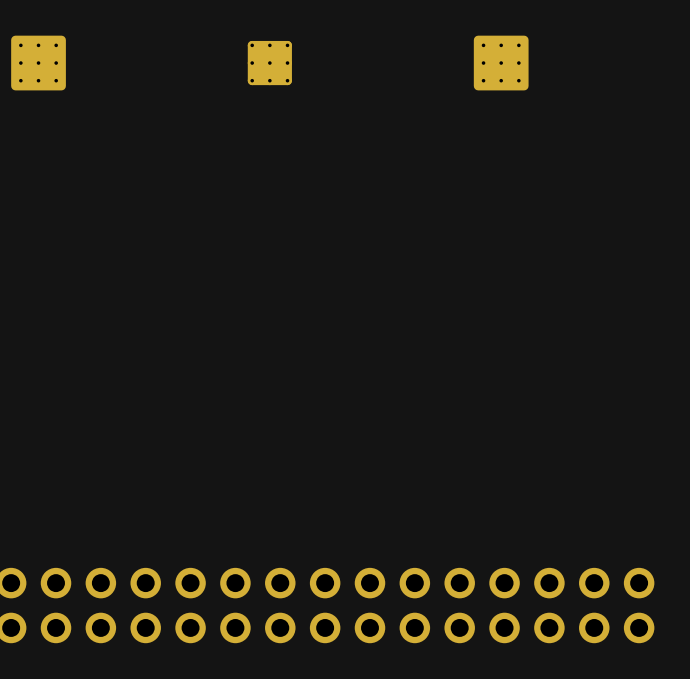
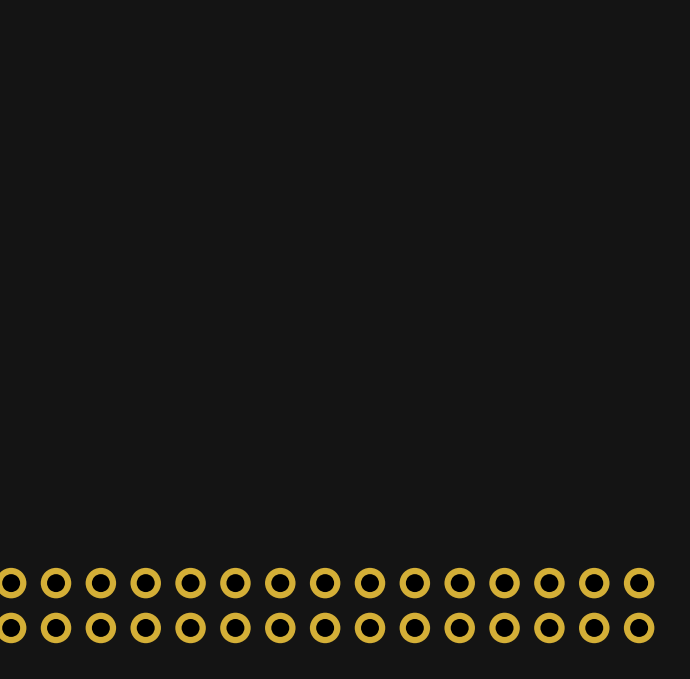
part: (38, 63) -> none
part: (269, 63) -> none
part: (501, 63) -> none

